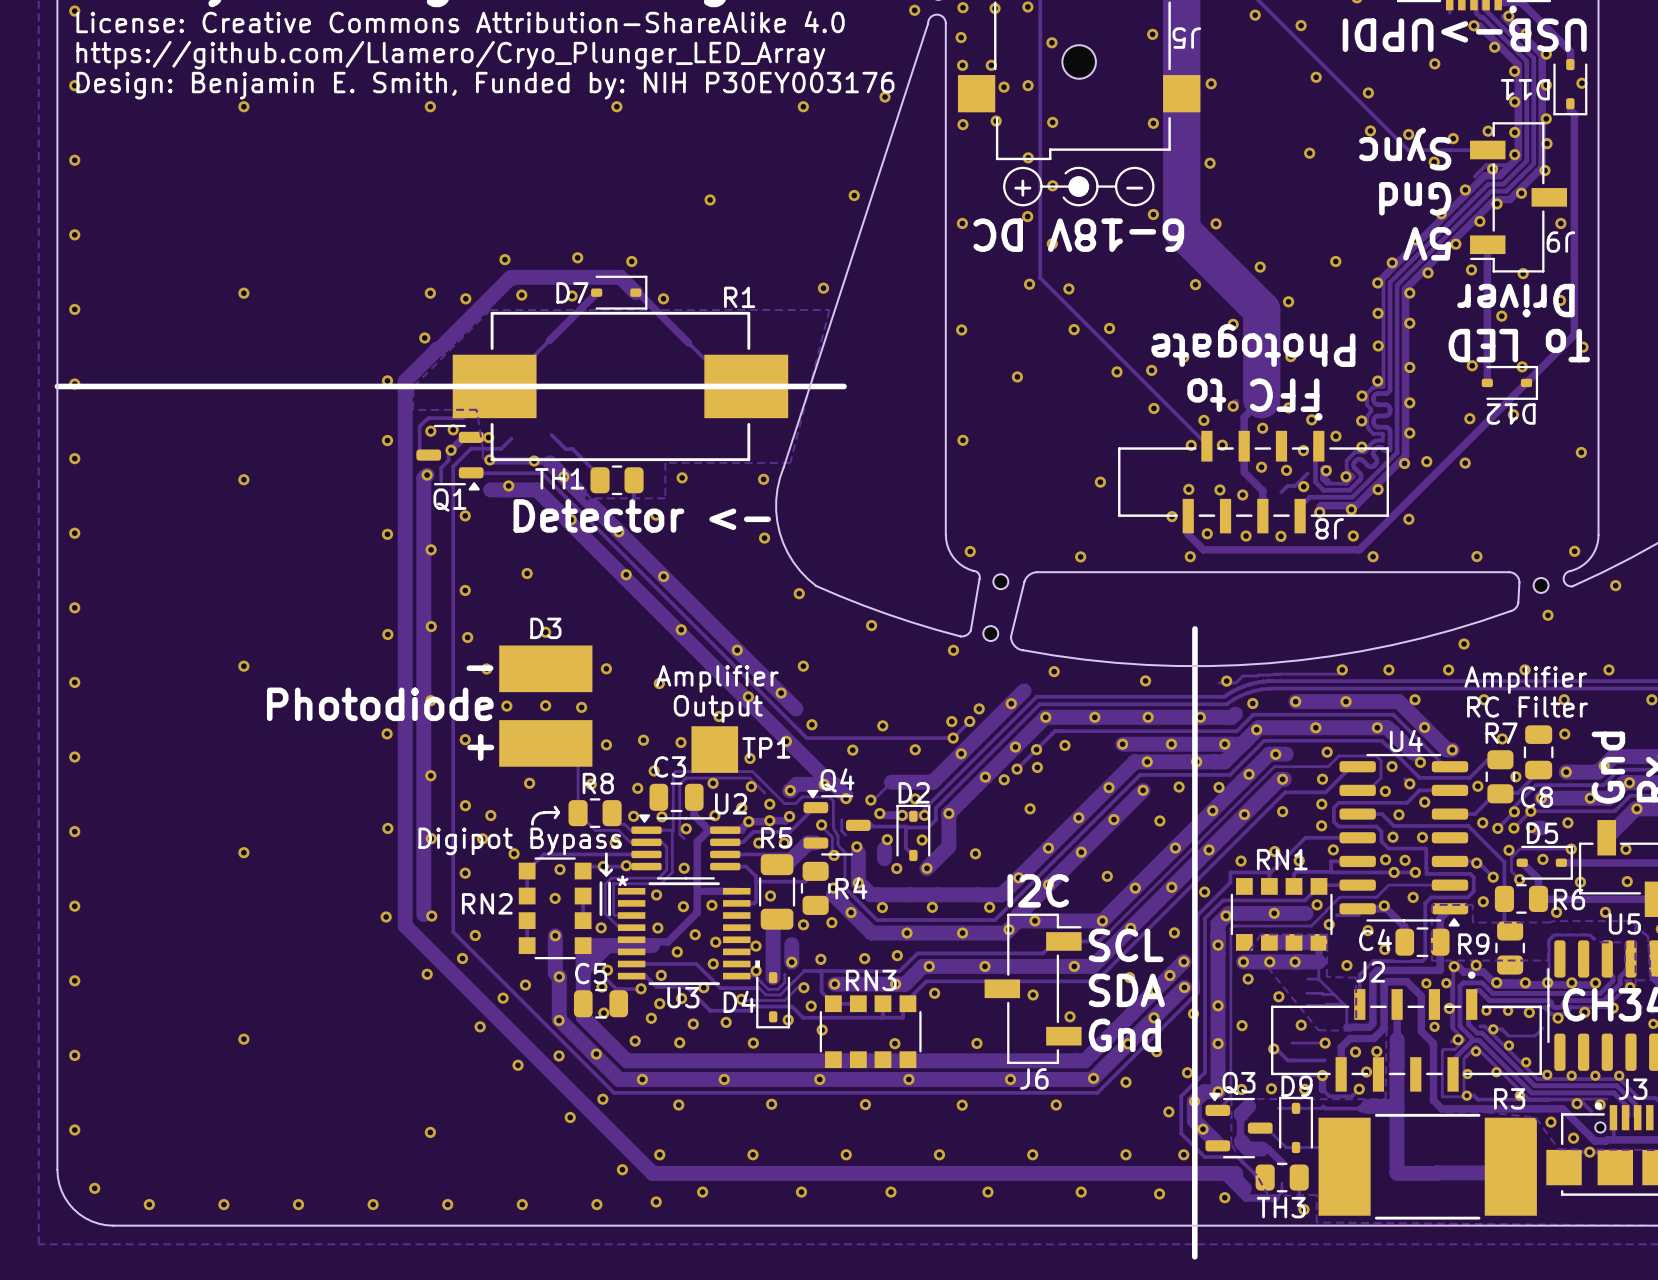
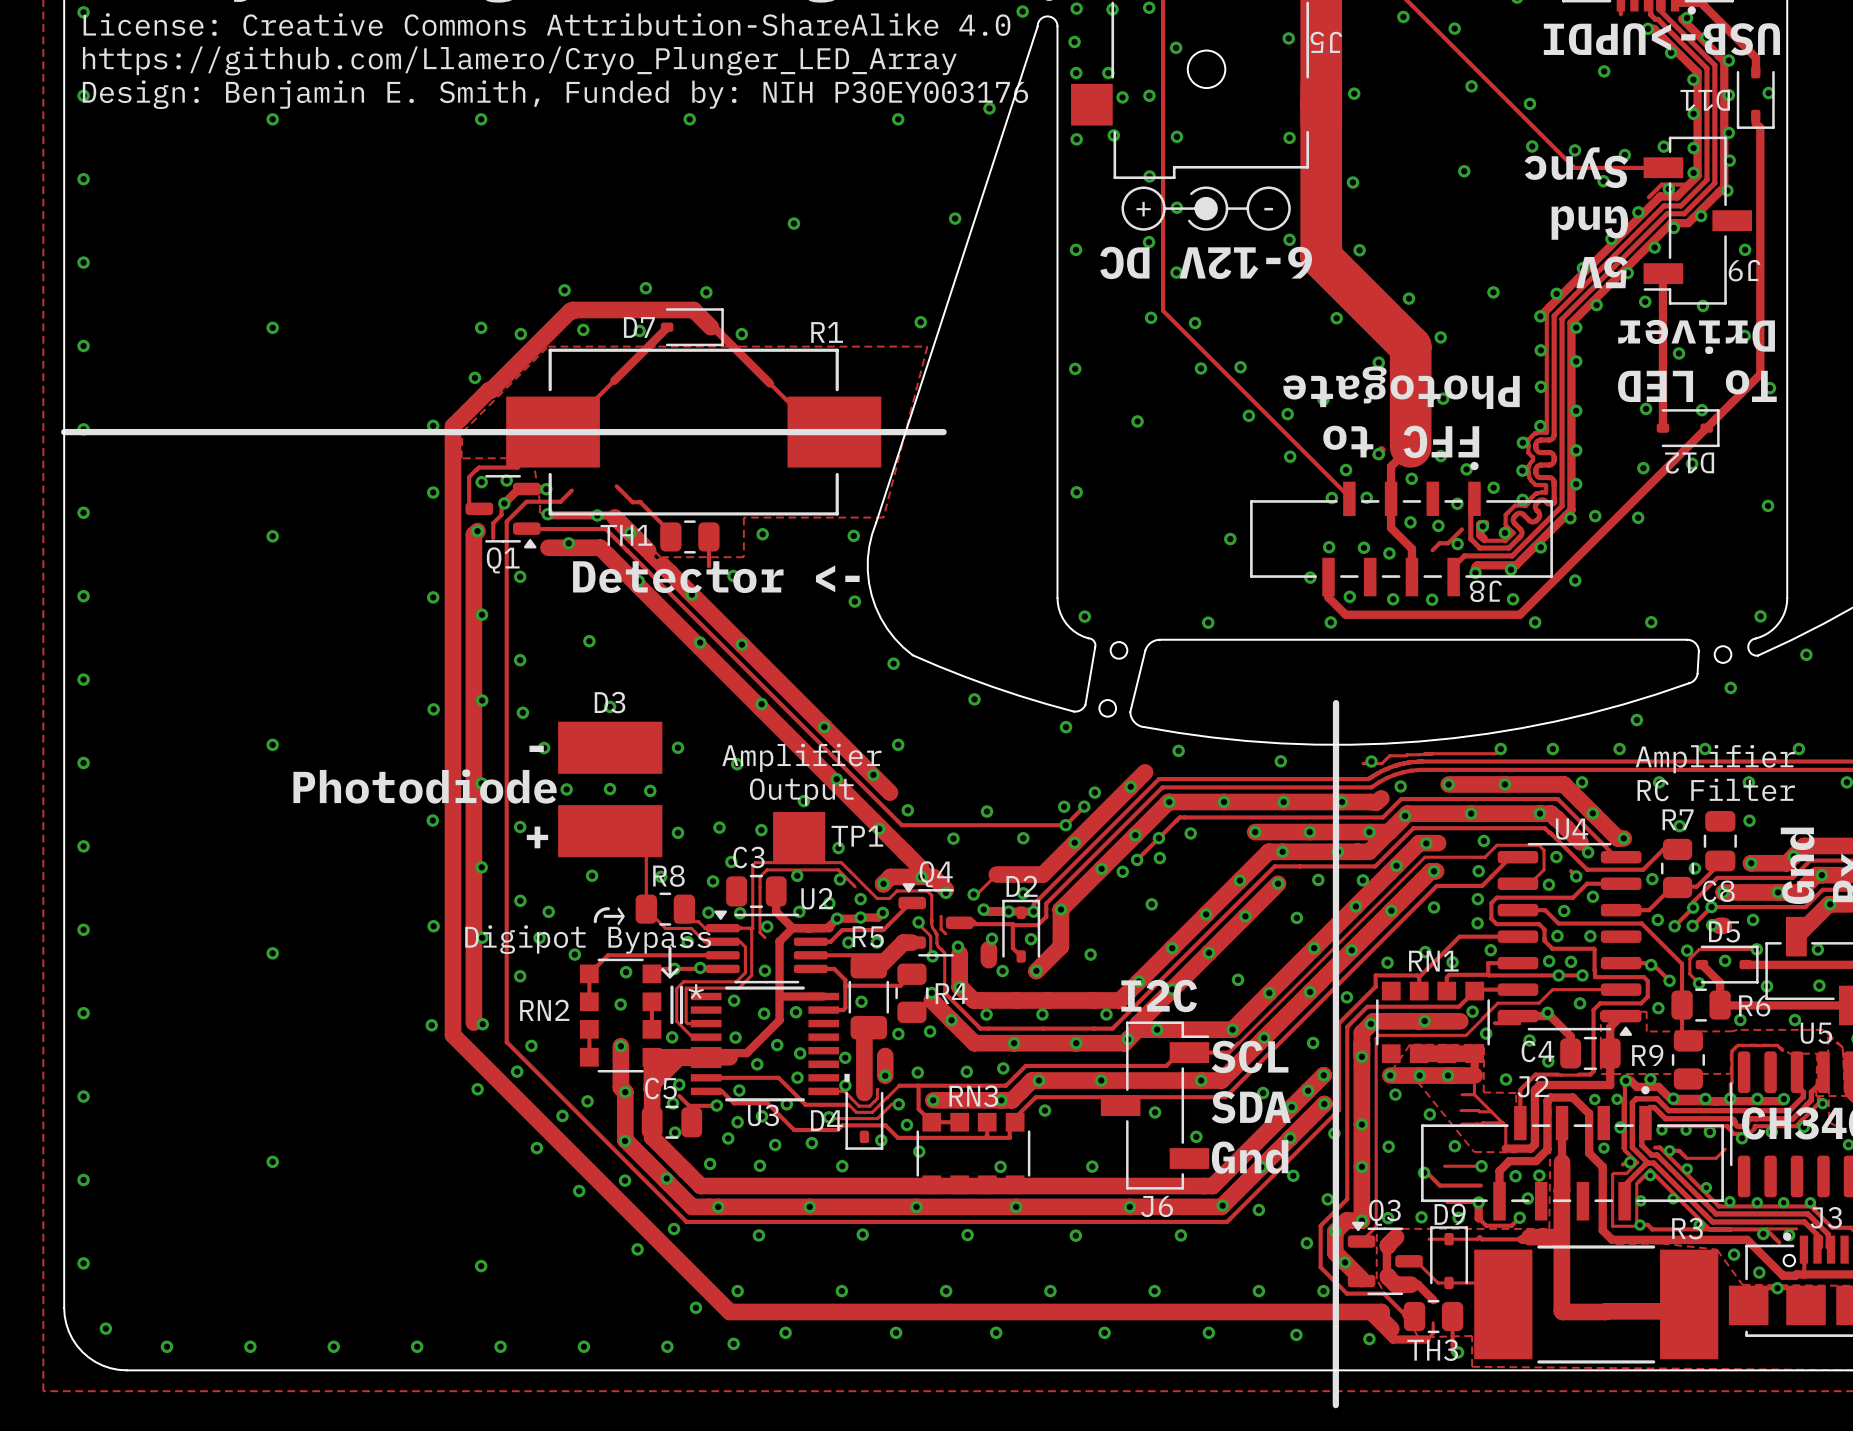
text: 6-18V DC (1078, 235) -> 6-12V DC (1206, 262)

